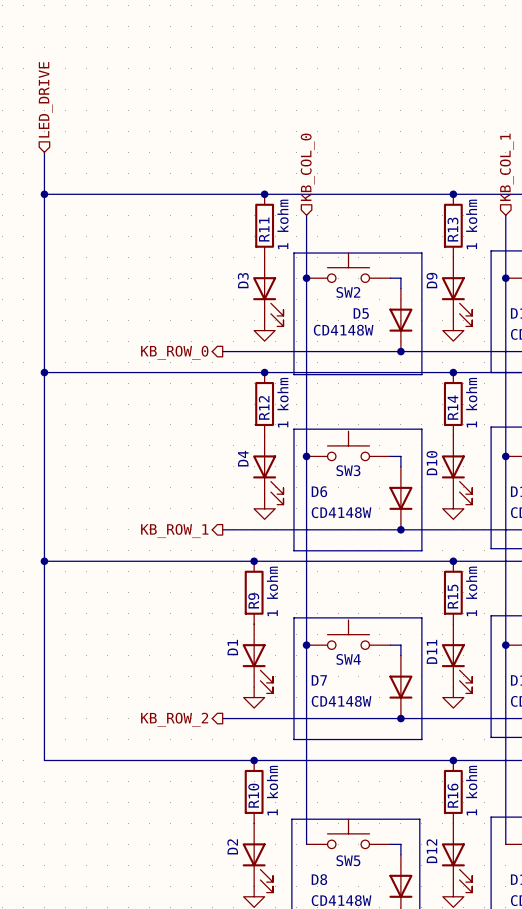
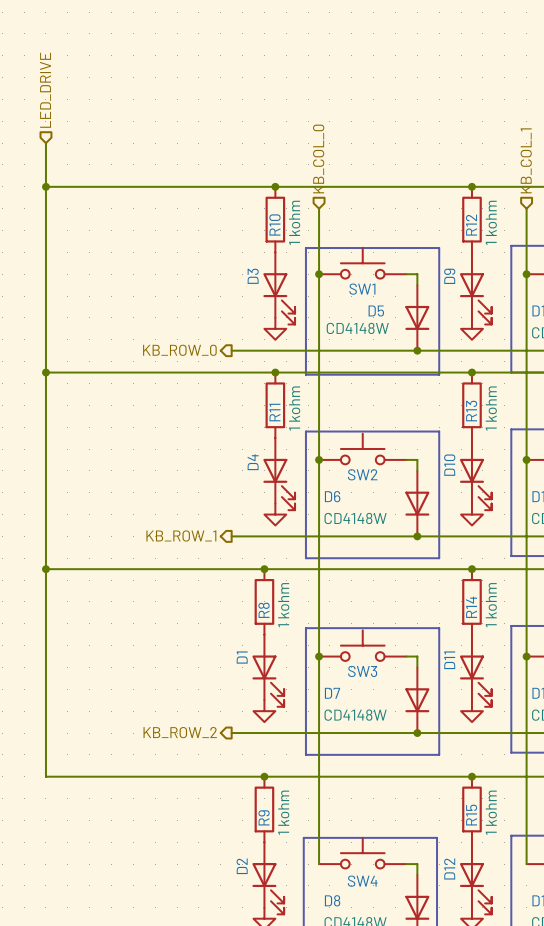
R11 name: R11 (264, 229) -> R10 (274, 224)
R13 name: R13 (452, 229) -> R12 (471, 225)
SW2 name: SW2 (348, 292) -> SW1 (362, 289)
R12 name: R12 (264, 407) -> R11 (274, 412)
R14 name: R14 (452, 407) -> R13 (471, 411)
SW3 name: SW3 (348, 470) -> SW2 (362, 474)
R15 name: R15 (453, 596) -> R14 (471, 607)
R9 name: R9 (253, 600) -> R8 (264, 610)
SW4 name: SW4 (348, 659) -> SW3 (362, 671)
R10 name: R10 (253, 795) -> R9 (264, 817)
R16 name: R16 (452, 795) -> R15 (471, 815)
SW5 name: SW5 (348, 860) -> SW4 (362, 881)

